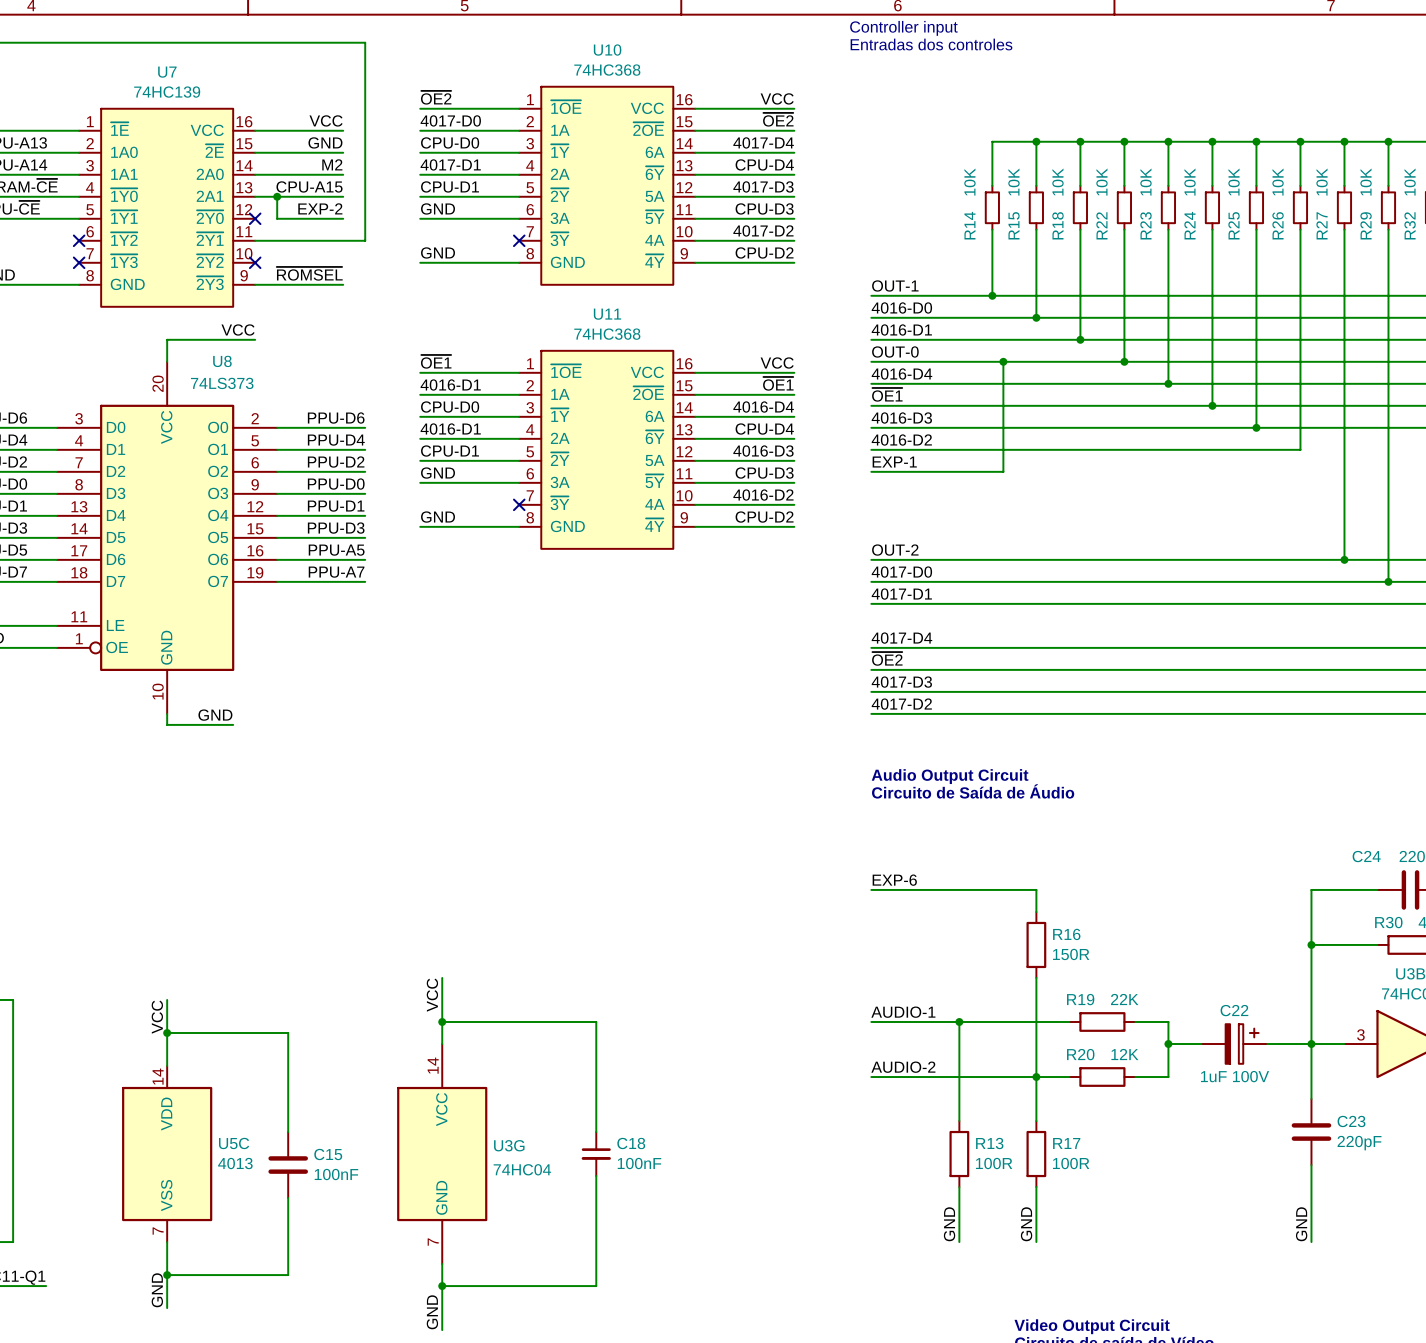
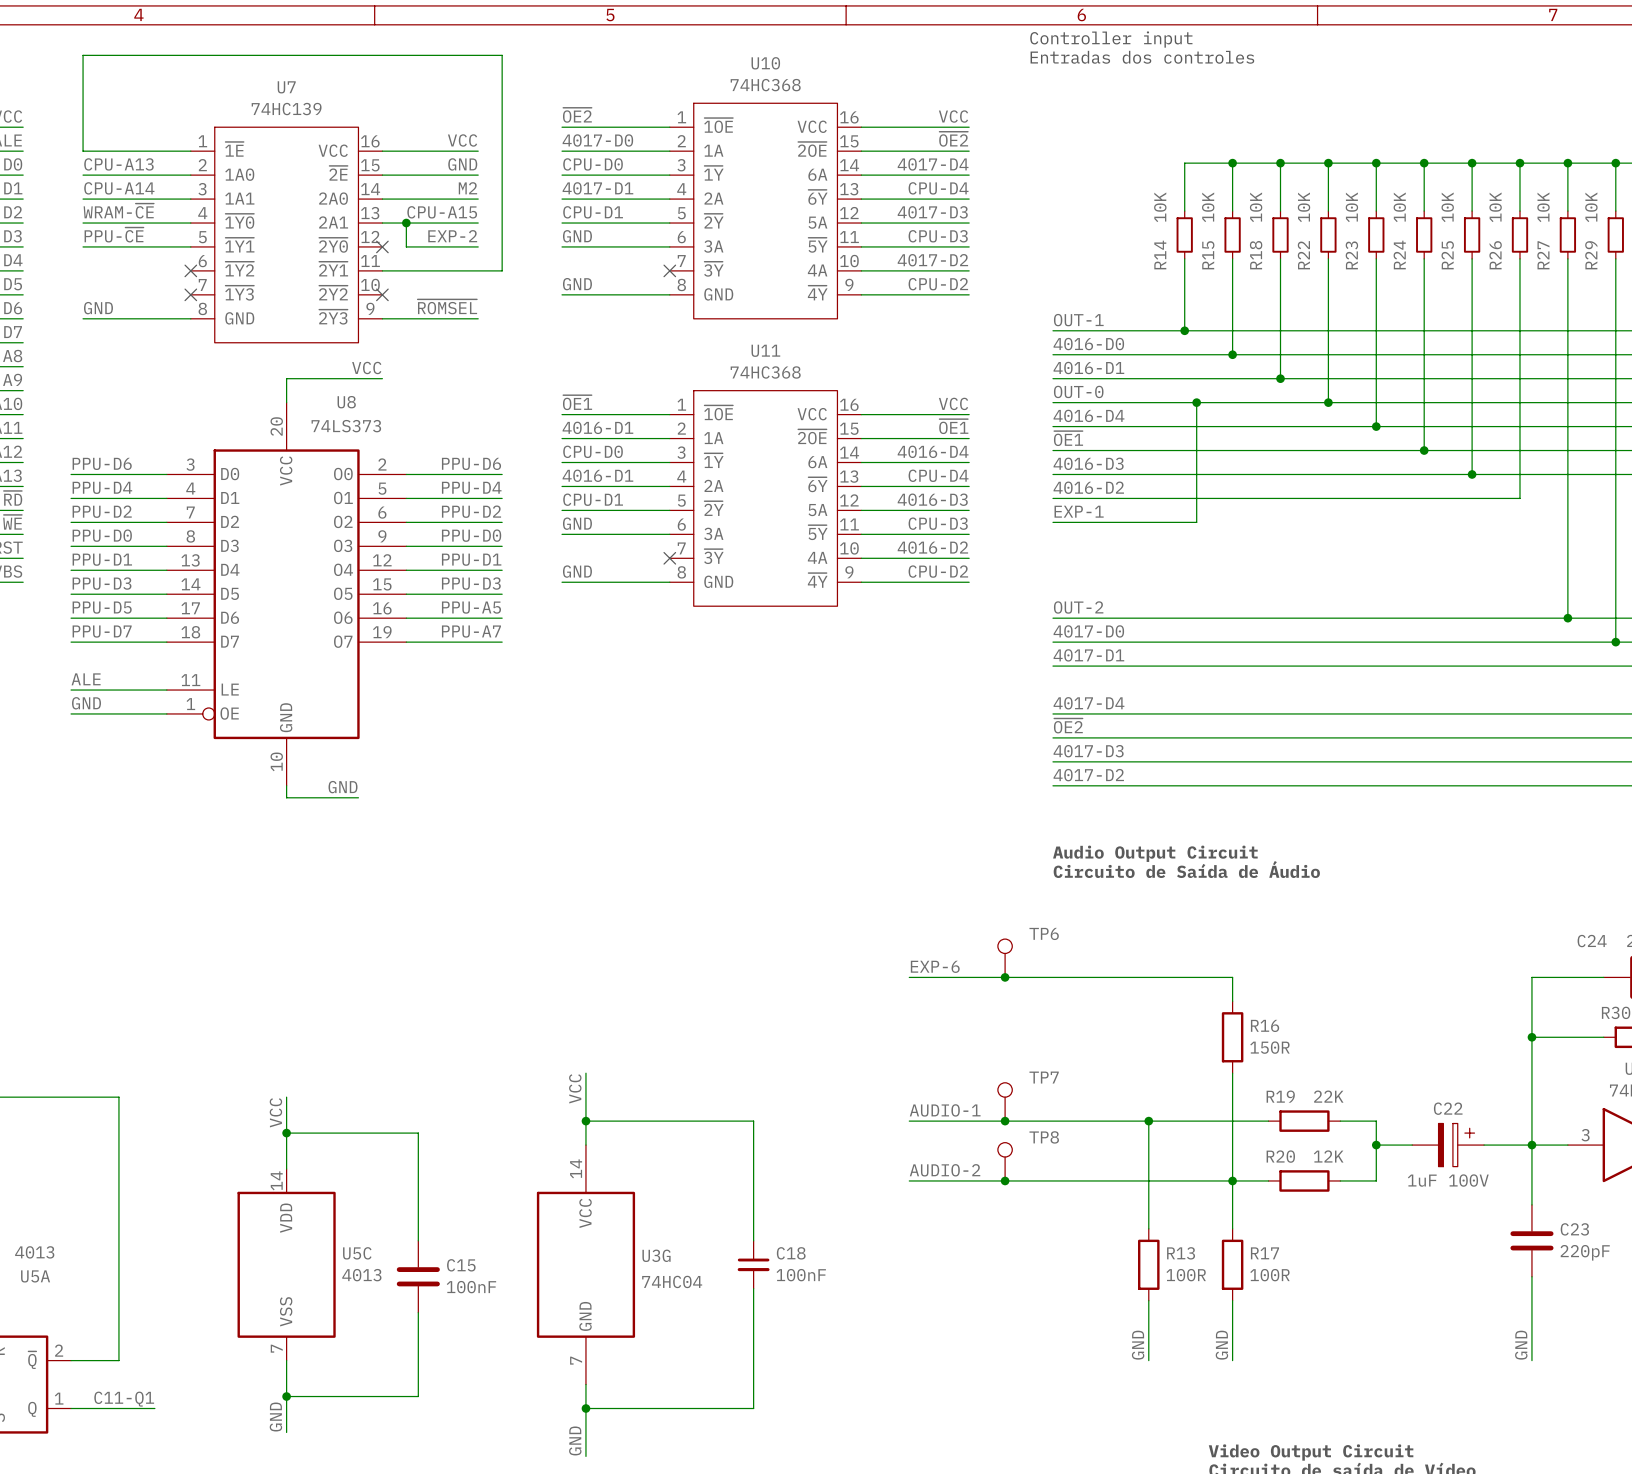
TP6: none -> (1005, 958)
label position: EXP-6 (894, 880) -> EXP-6 (935, 966)
wire: none -> (909, 977) (1052, 977)
junction: none -> (1005, 977)
TP7: none -> (1005, 1101)
label position: AUDIO-1 (903, 1012) -> AUDIO-1 (945, 1110)
wire: none -> (909, 1121) (1052, 1121)
junction: none -> (1005, 1121)
TP8: none -> (1005, 1161)
label position: AUDIO-2 (903, 1067) -> AUDIO-2 (945, 1170)
wire: none -> (909, 1180) (1052, 1180)
junction: none -> (1005, 1180)

